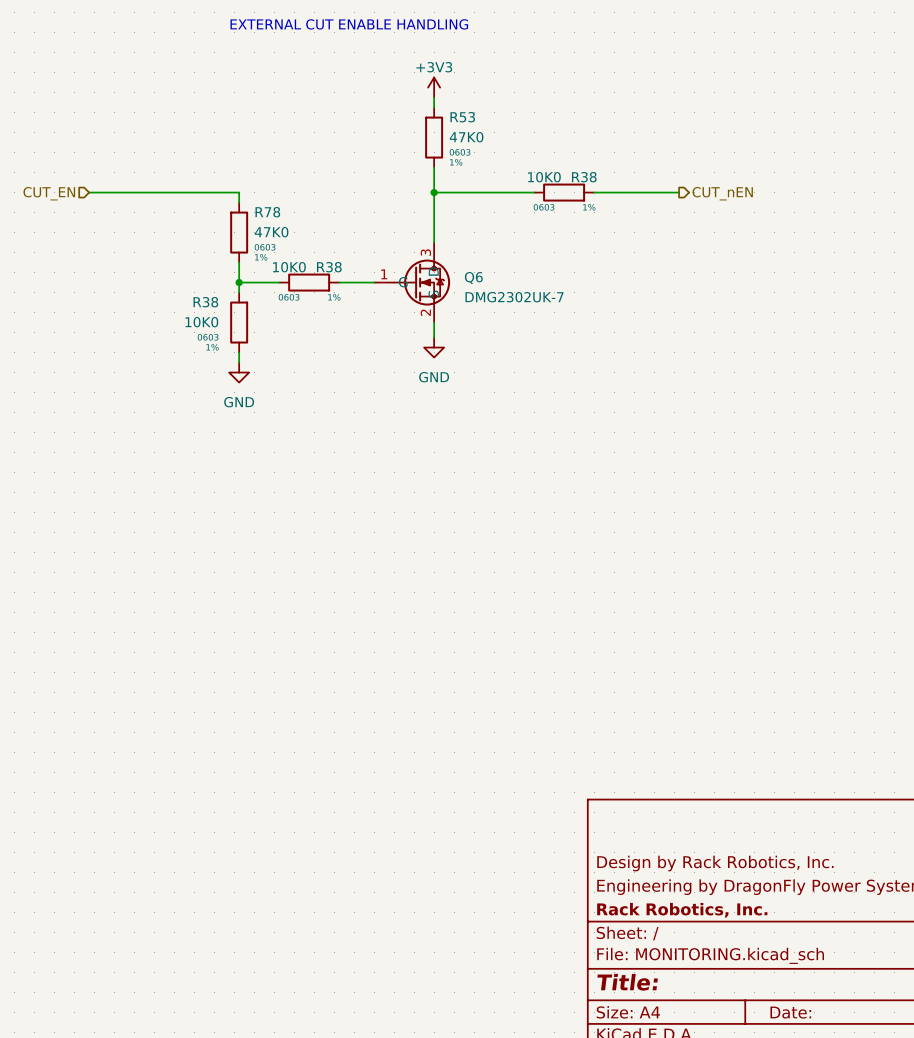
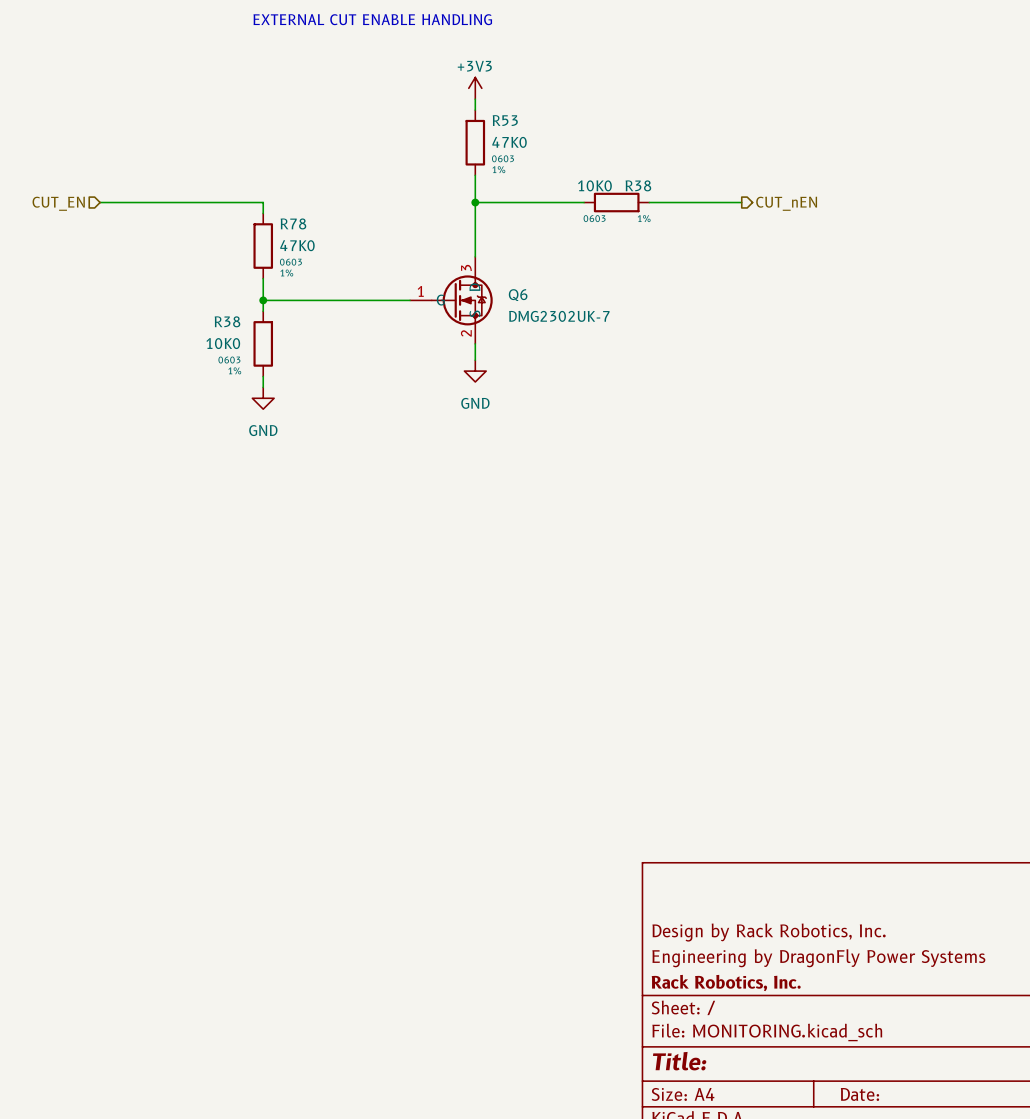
wire: none -> (306, 300) (371, 300)
R38: 10K0 (309, 282) -> none

